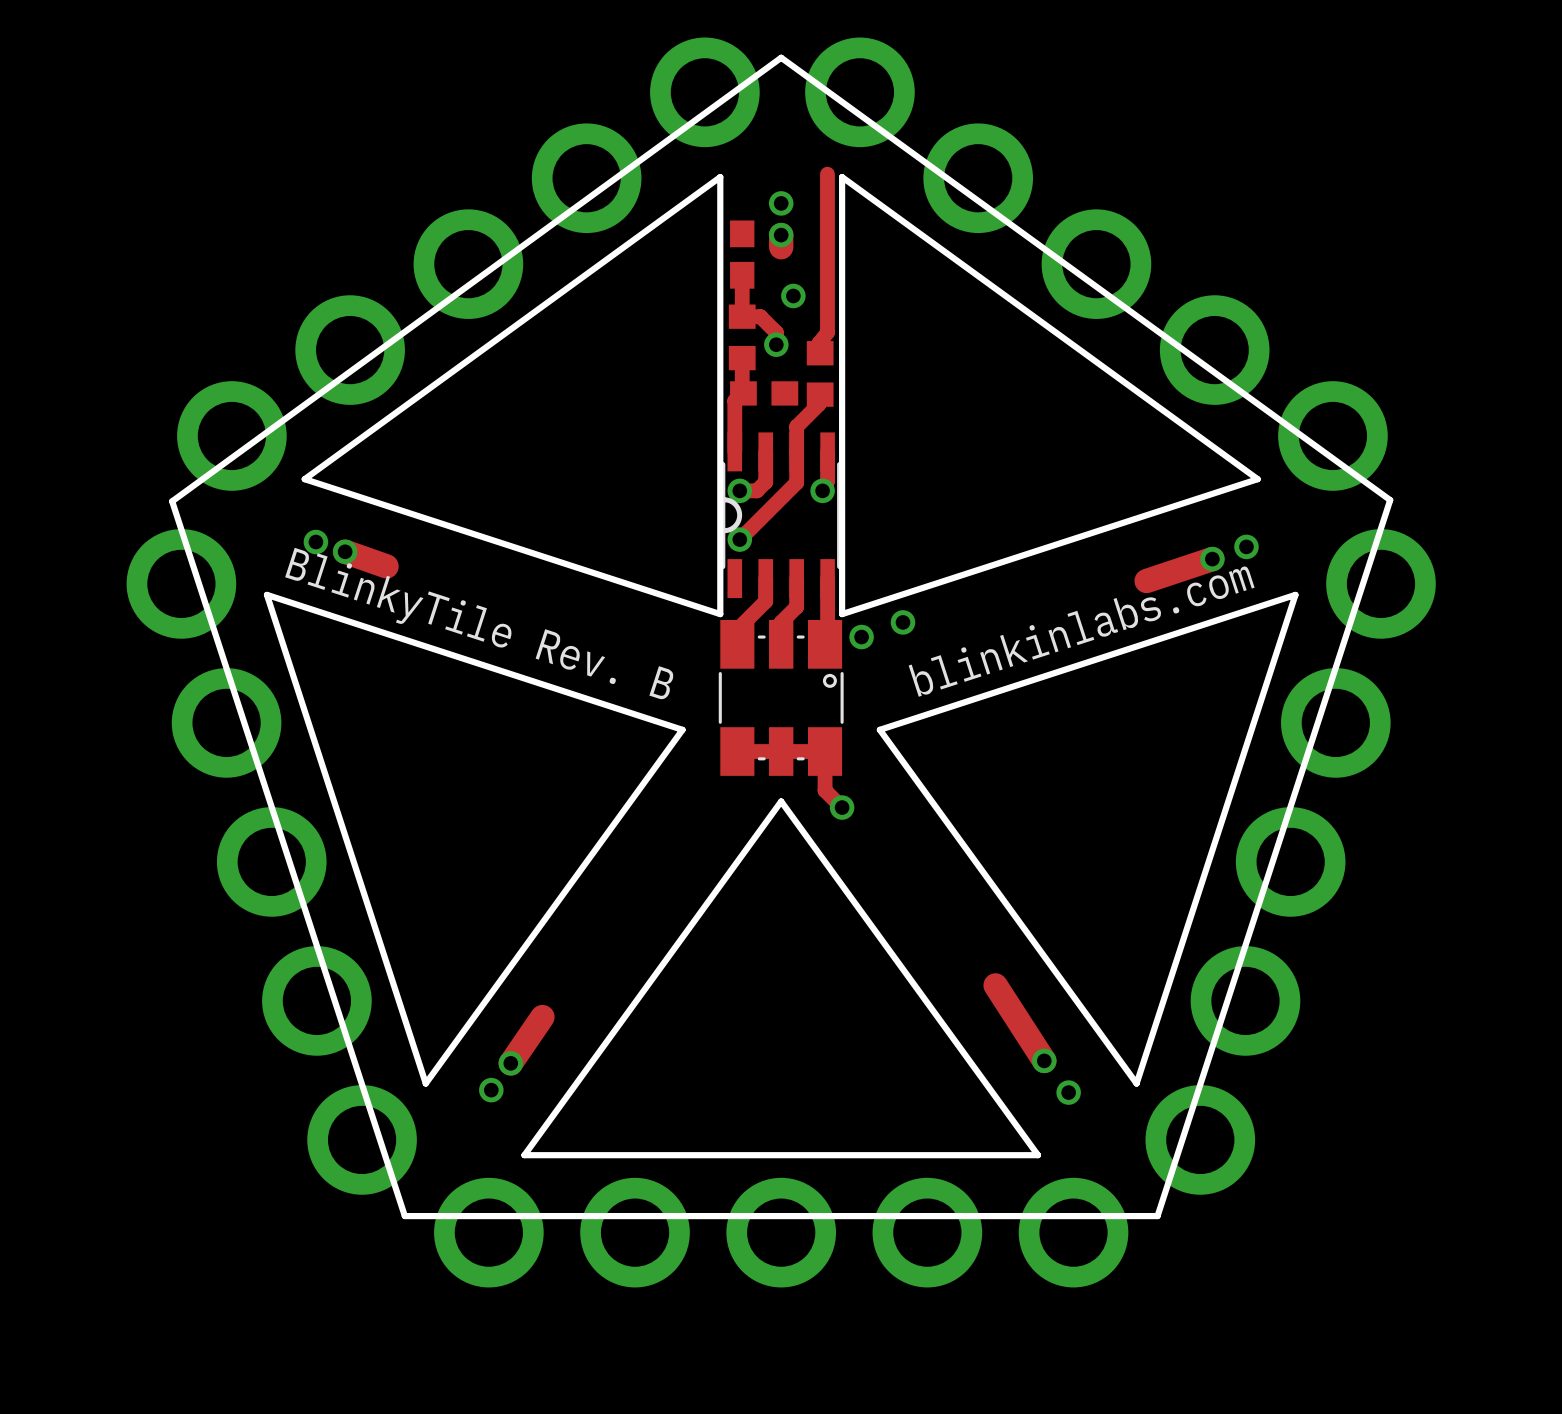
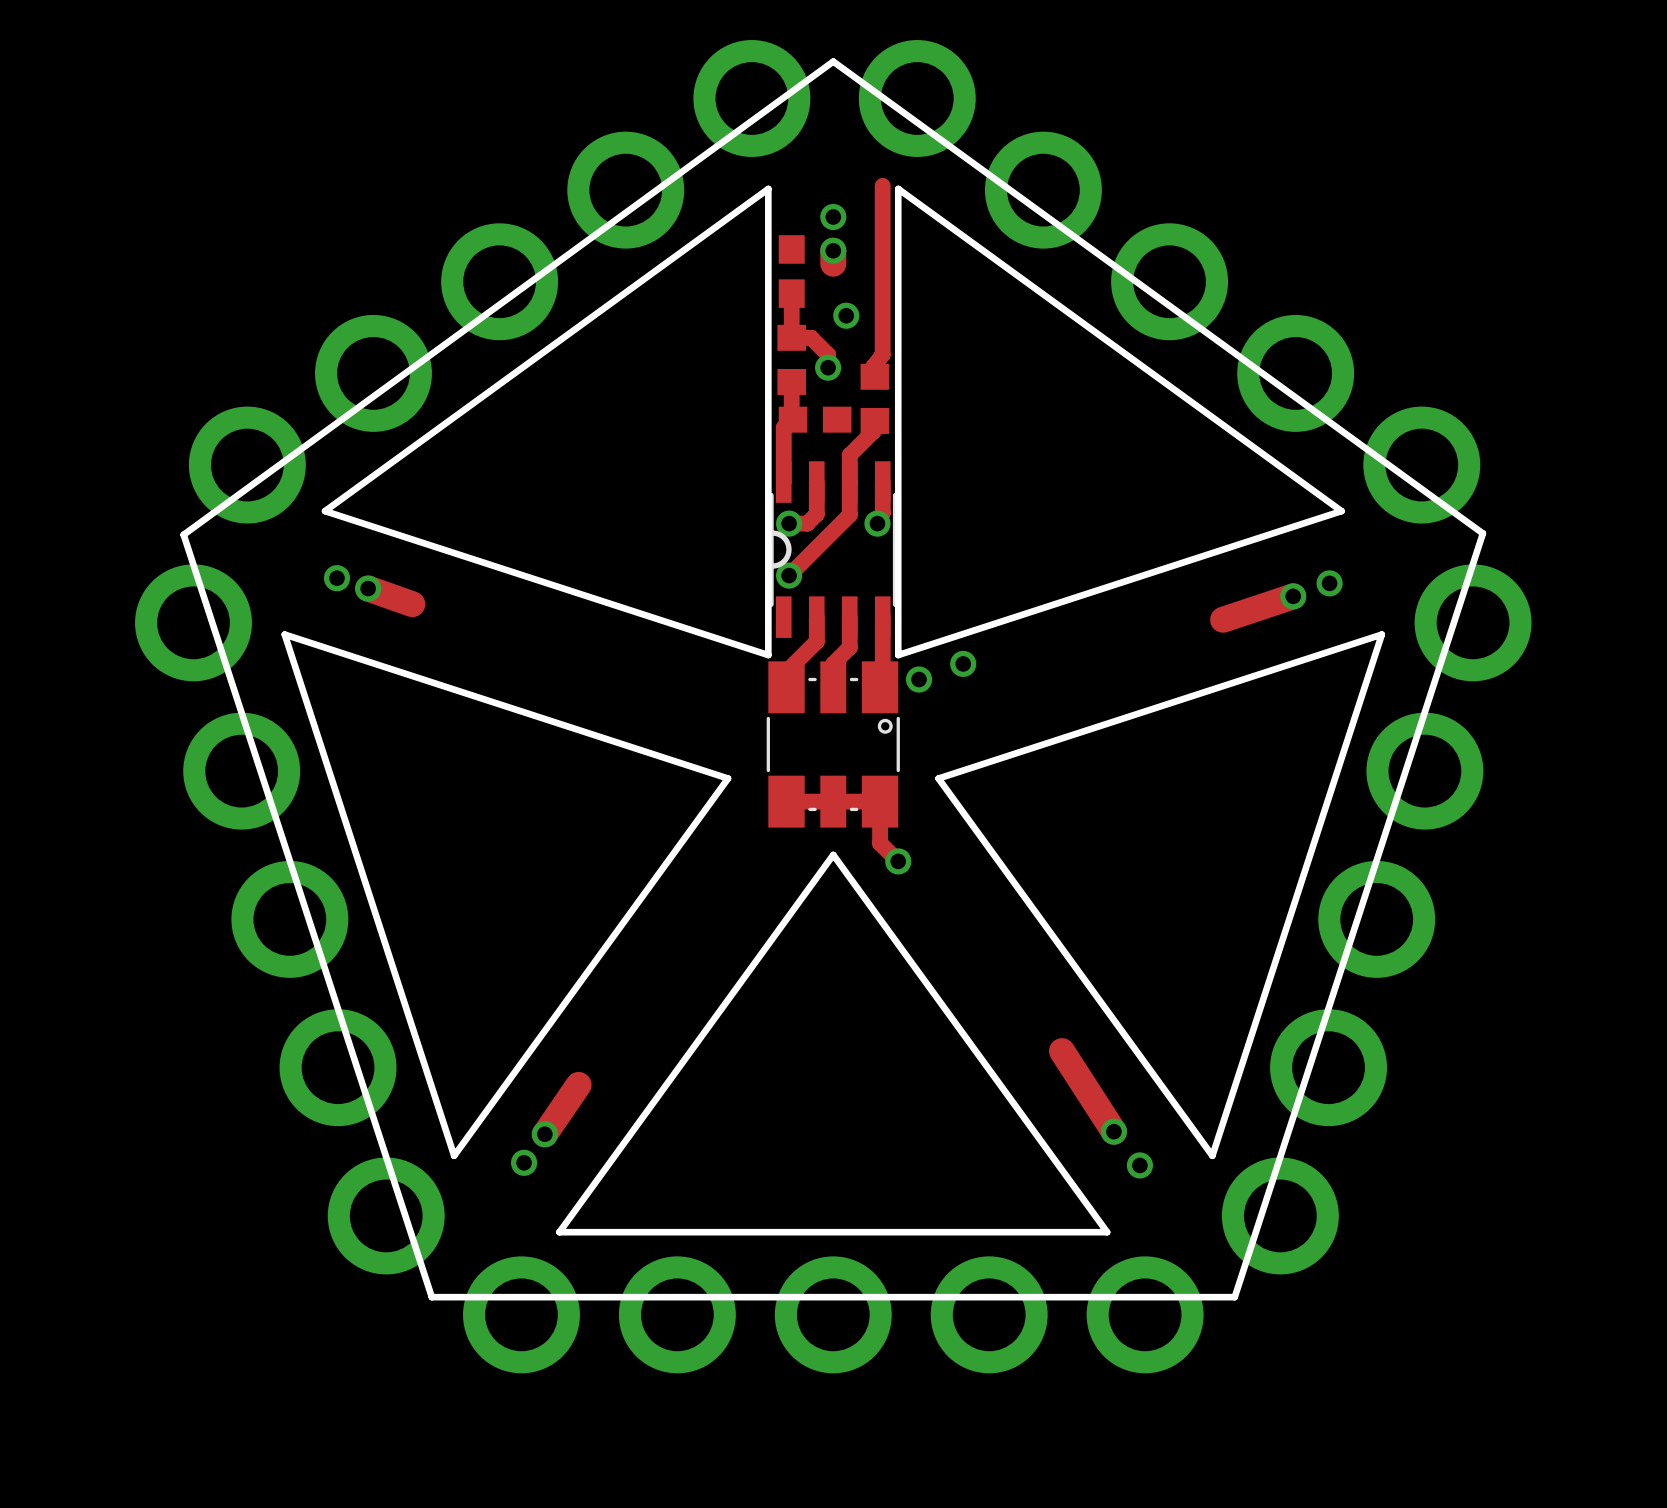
text: BlinkyTile Rev. B (479, 623) -> none
text: blinkinlabs.com (1081, 631) -> none

